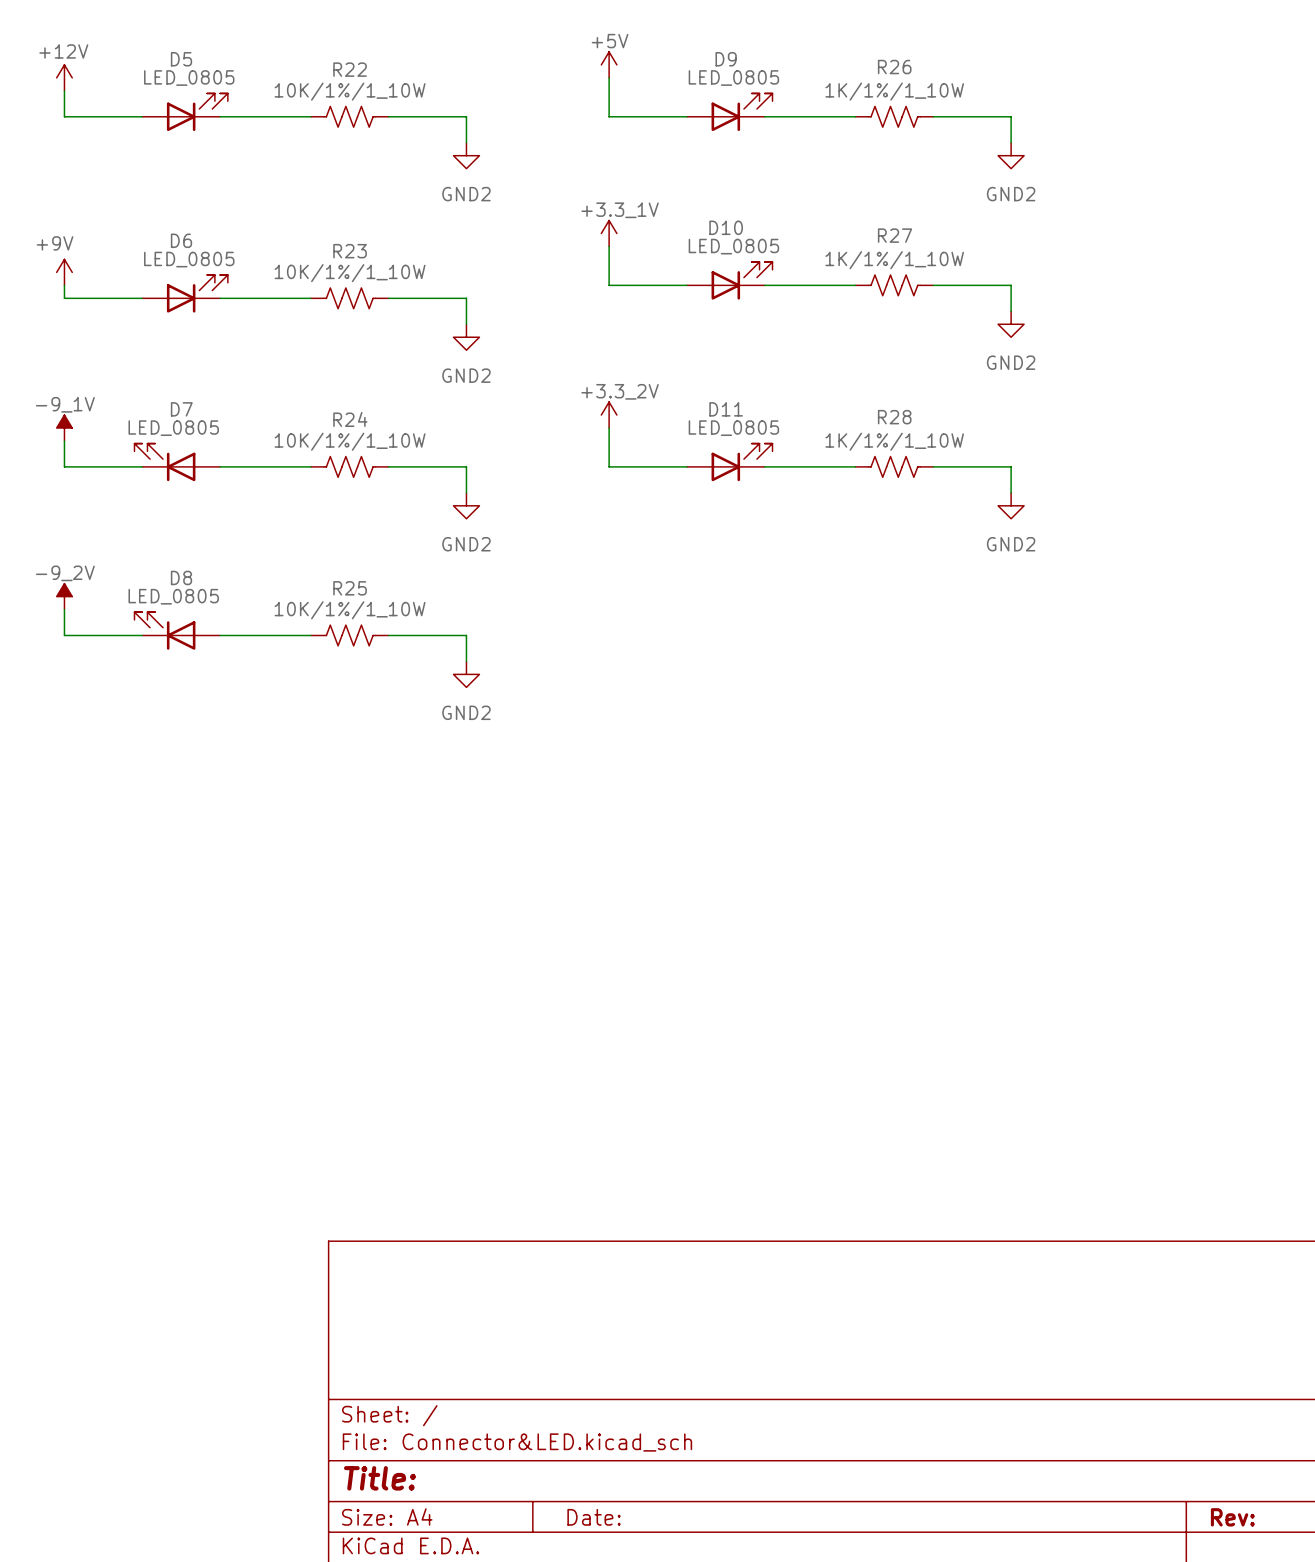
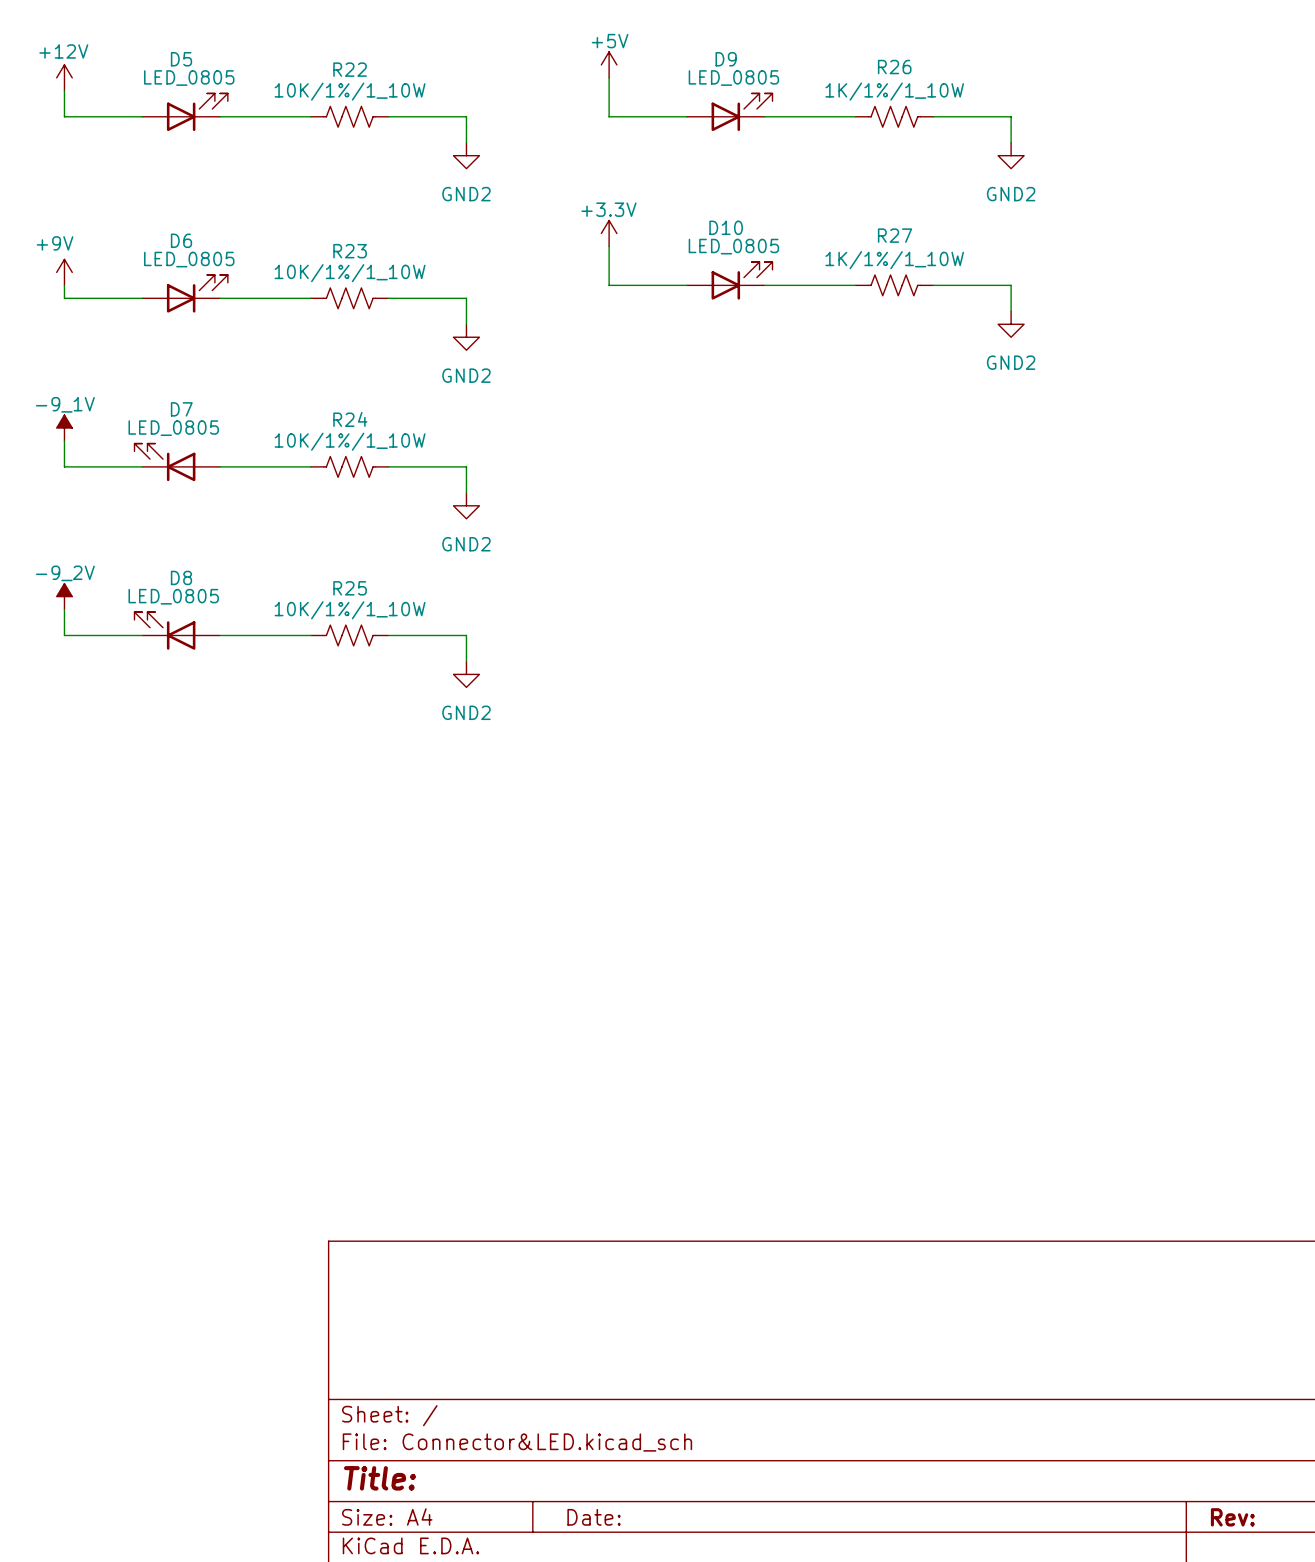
power symbol: +3.3_1V (609, 233) -> +3.3V (609, 233)
power symbol: +3.3_2V (609, 415) -> none
wire: (609, 428) (609, 466) (686, 466) -> none
D11: LED_0805 (729, 462) -> none
wire: (764, 466) (855, 466) -> none
R28: 1K/1%/1_10W (894, 466) -> none
wire: (933, 466) (1011, 466) (1011, 492) -> none
power symbol: GND2 (1011, 505) -> none

